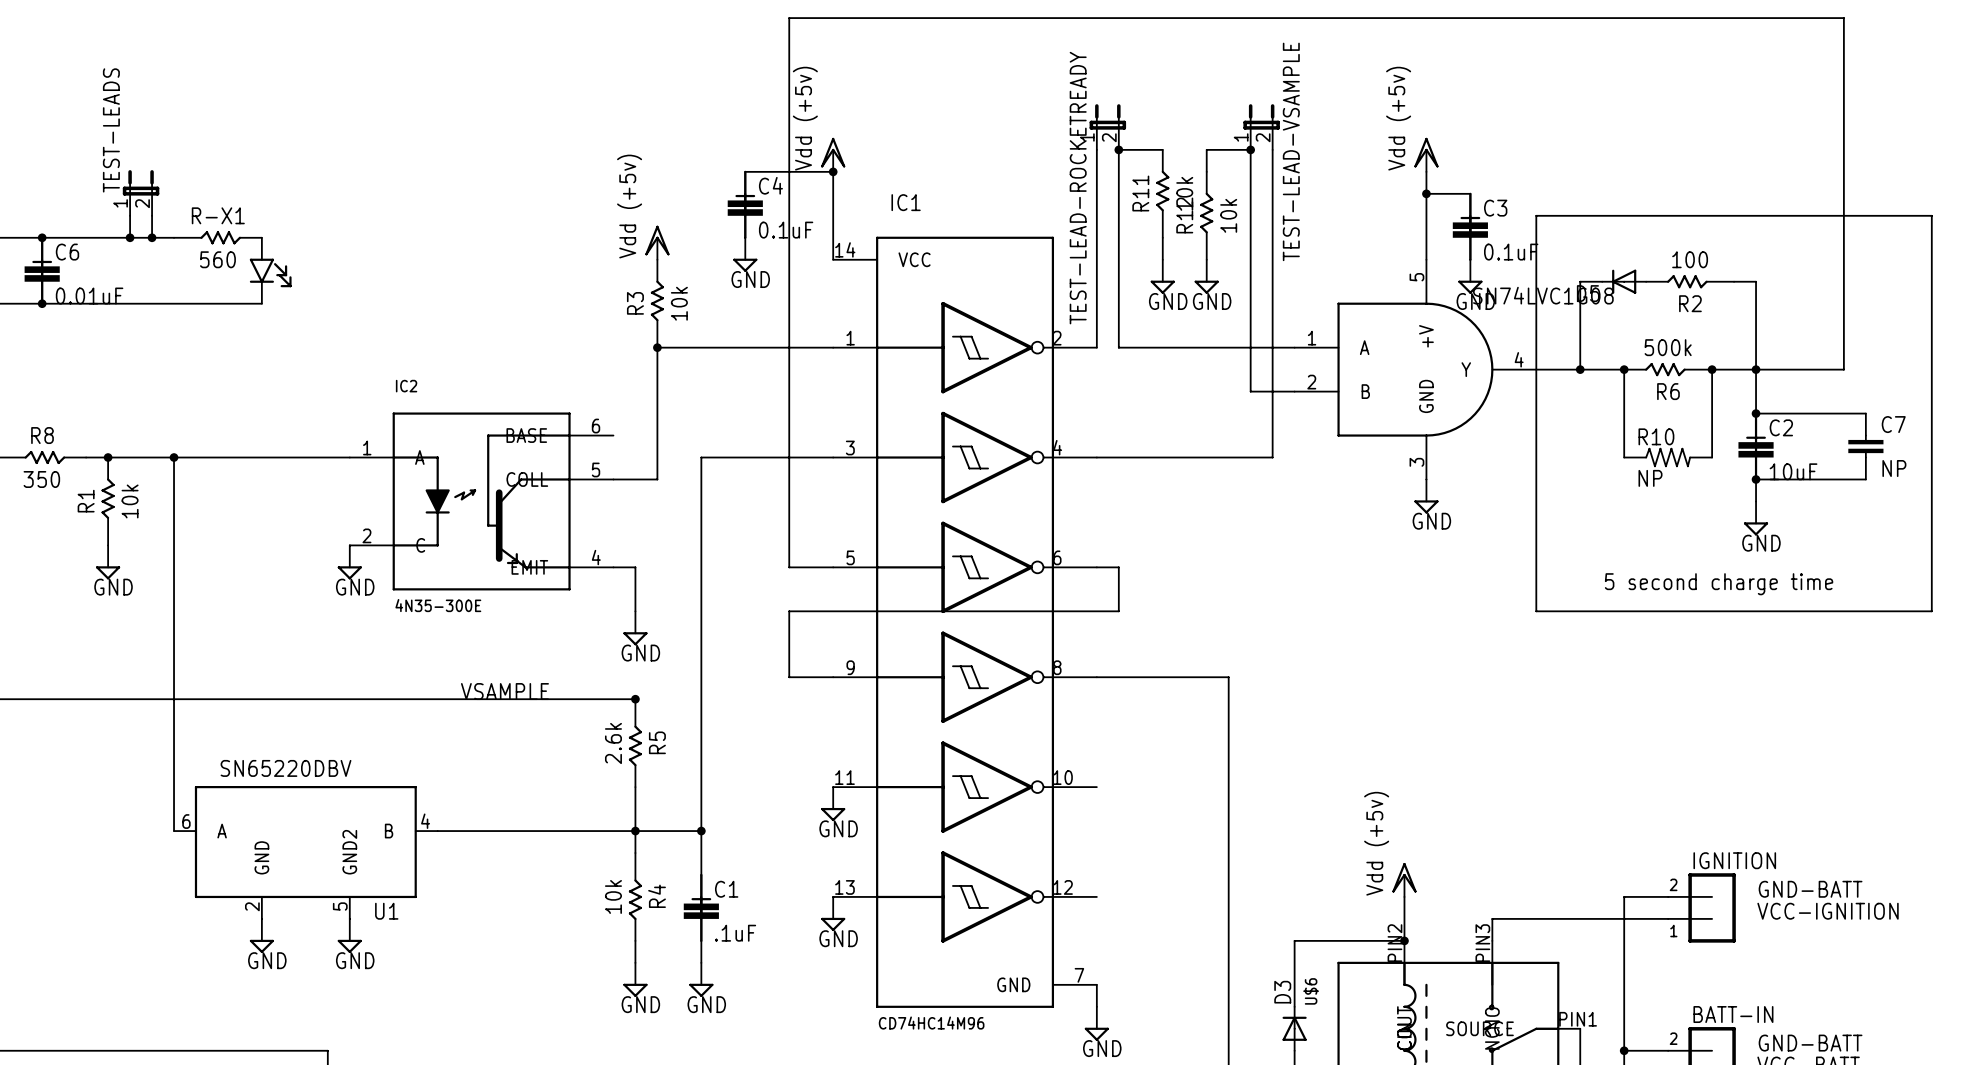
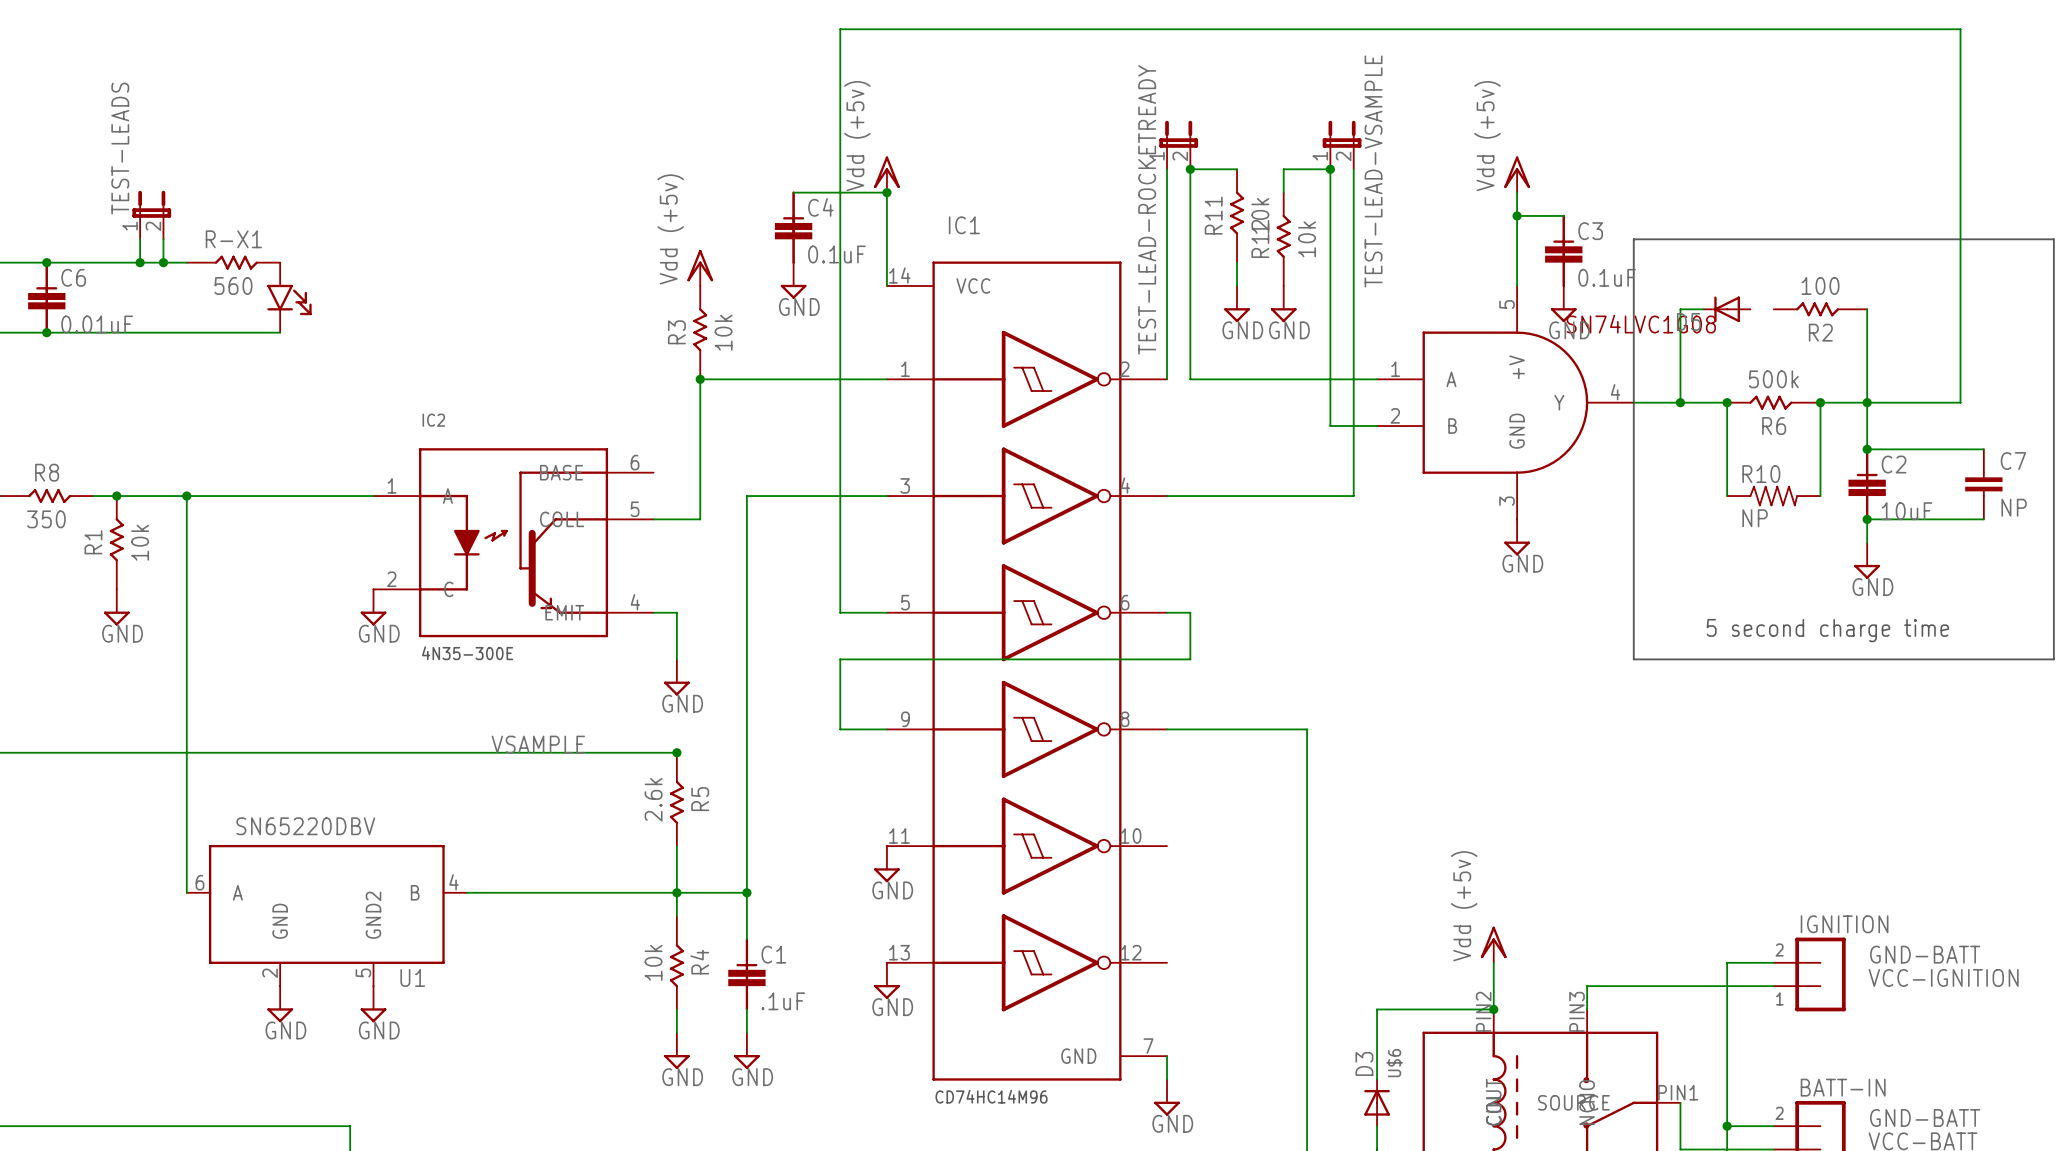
R2 position: (1690, 281) -> (1820, 309)

